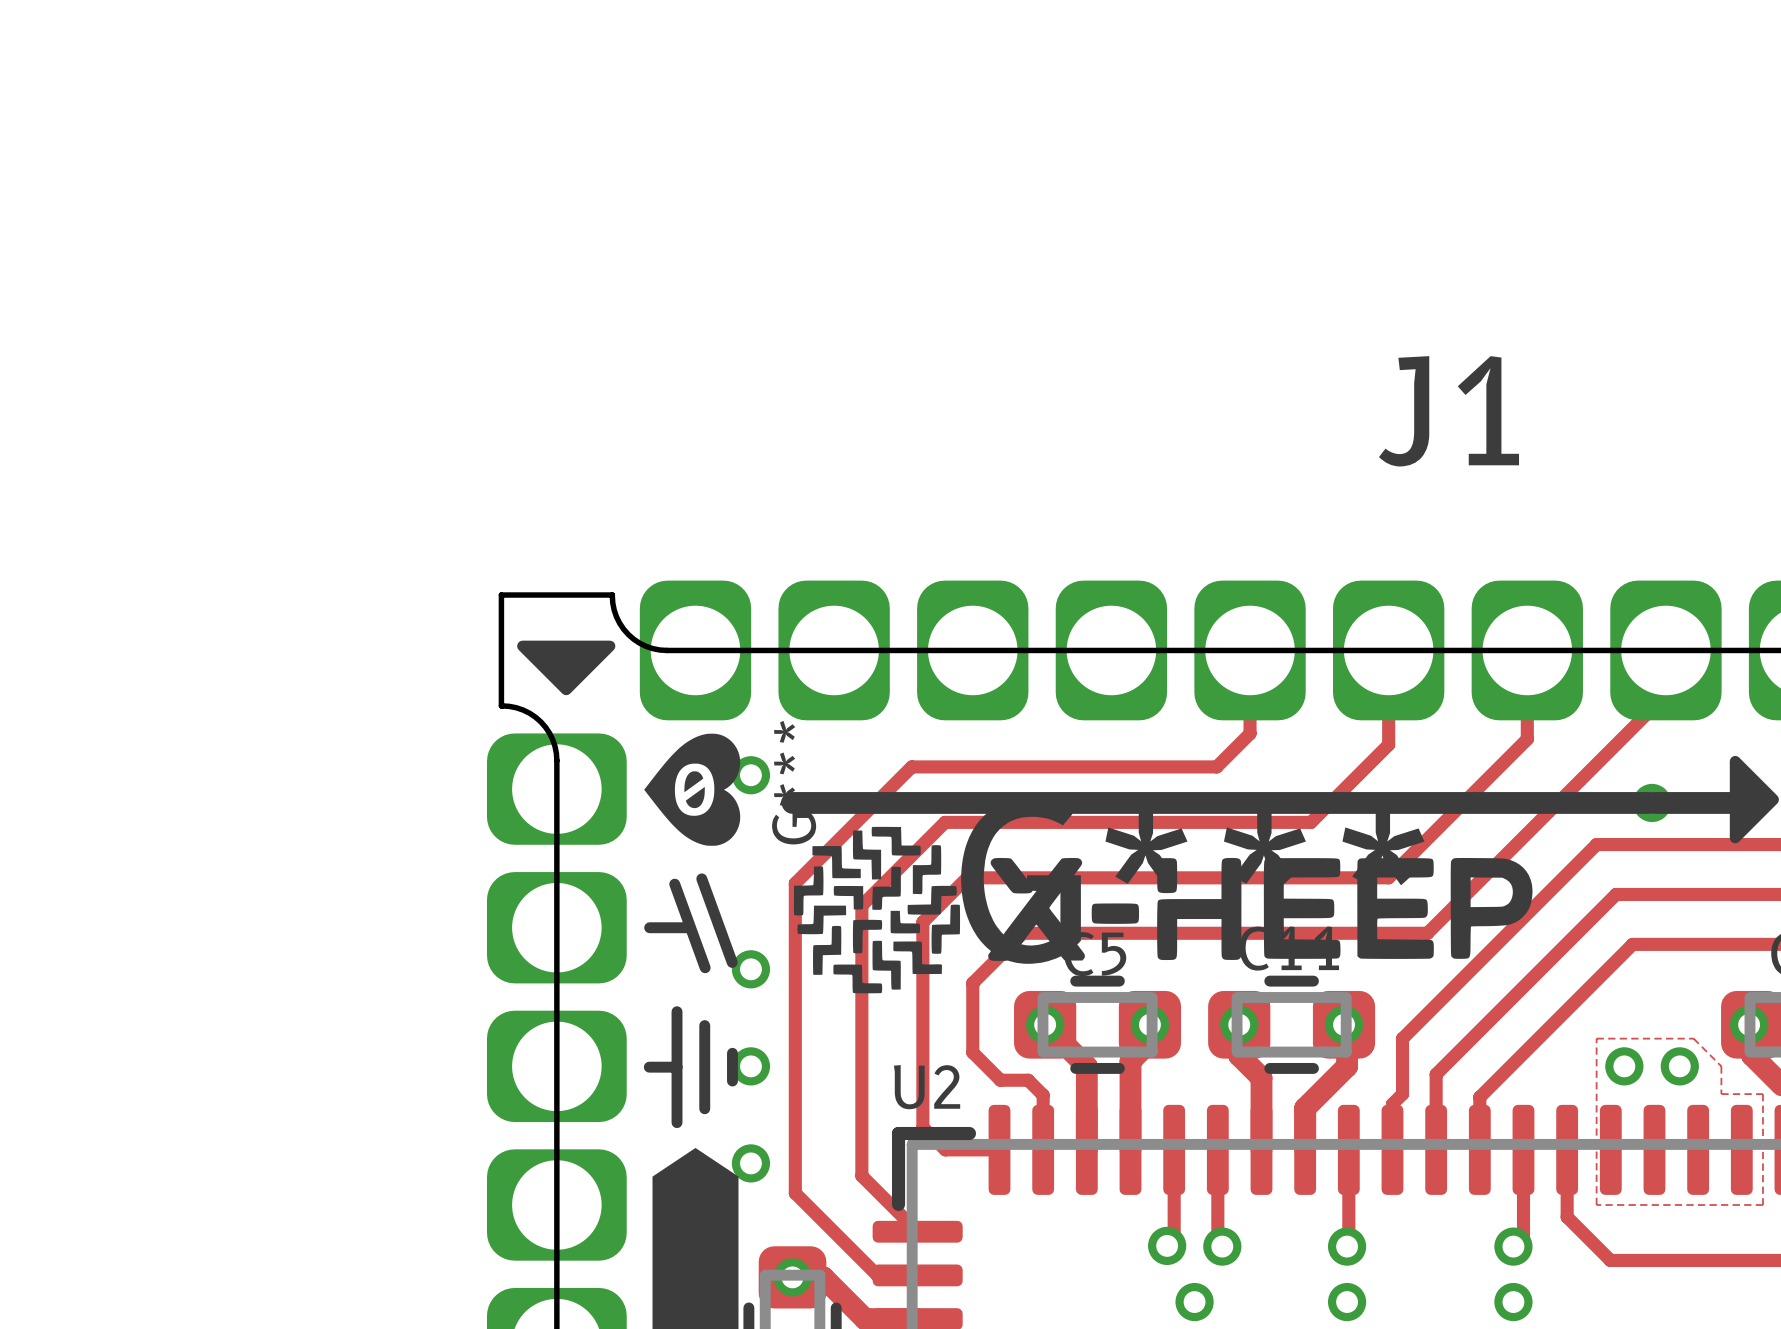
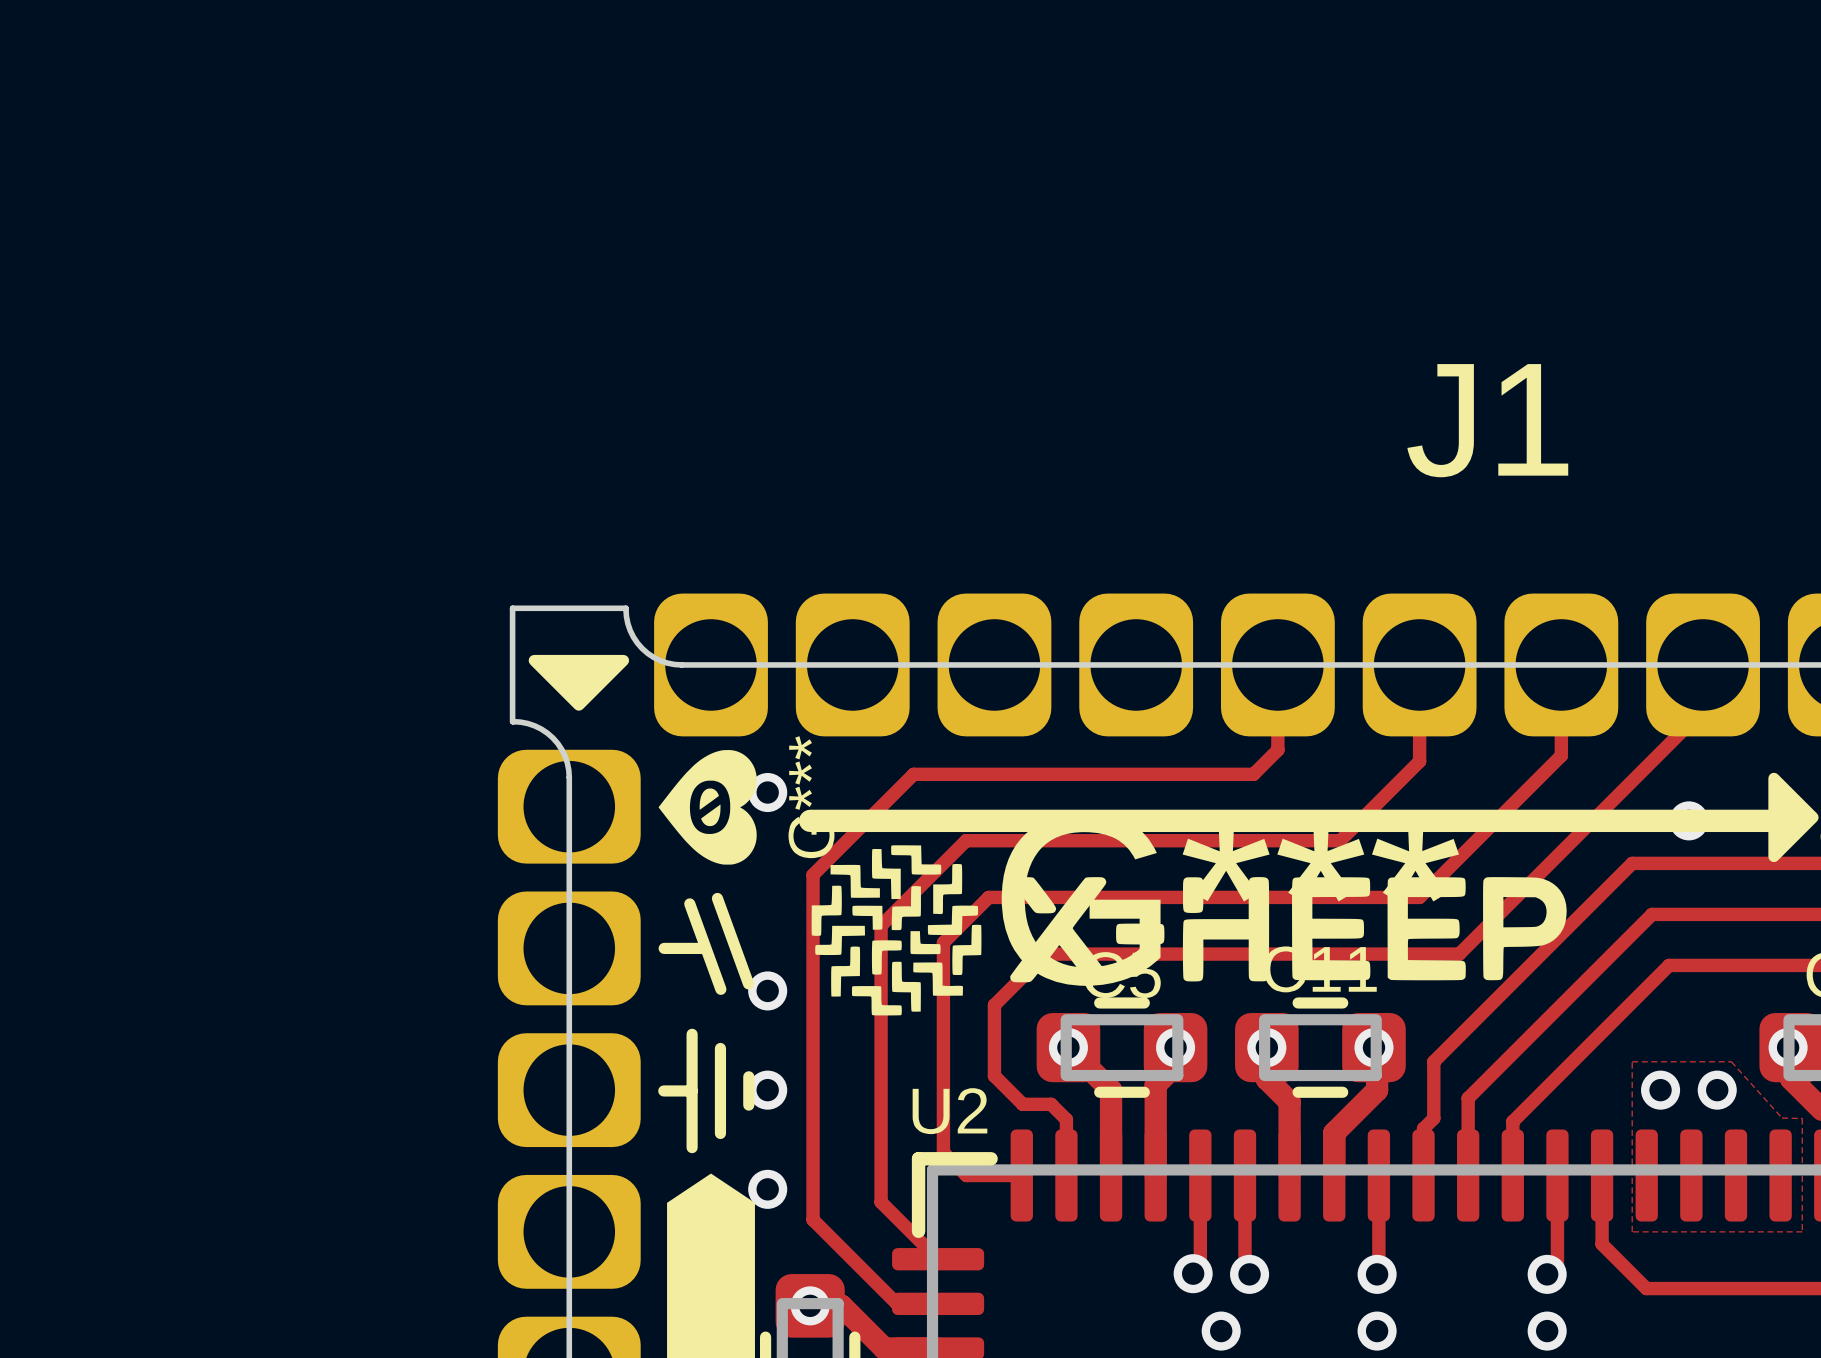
track: (1226, 757) (1216, 766) (911, 766) (795, 883) -> (1253, 774) (913, 774) (813, 874) (813, 903)
zone outline: (1693, 1038) (1721, 1066) (1721, 1094) (1762, 1094) -> (1731, 1061) (1782, 1118) (1802, 1118)

